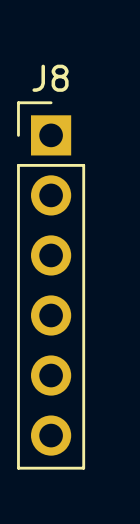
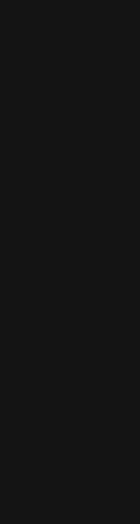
J8: (51, 285) -> none

